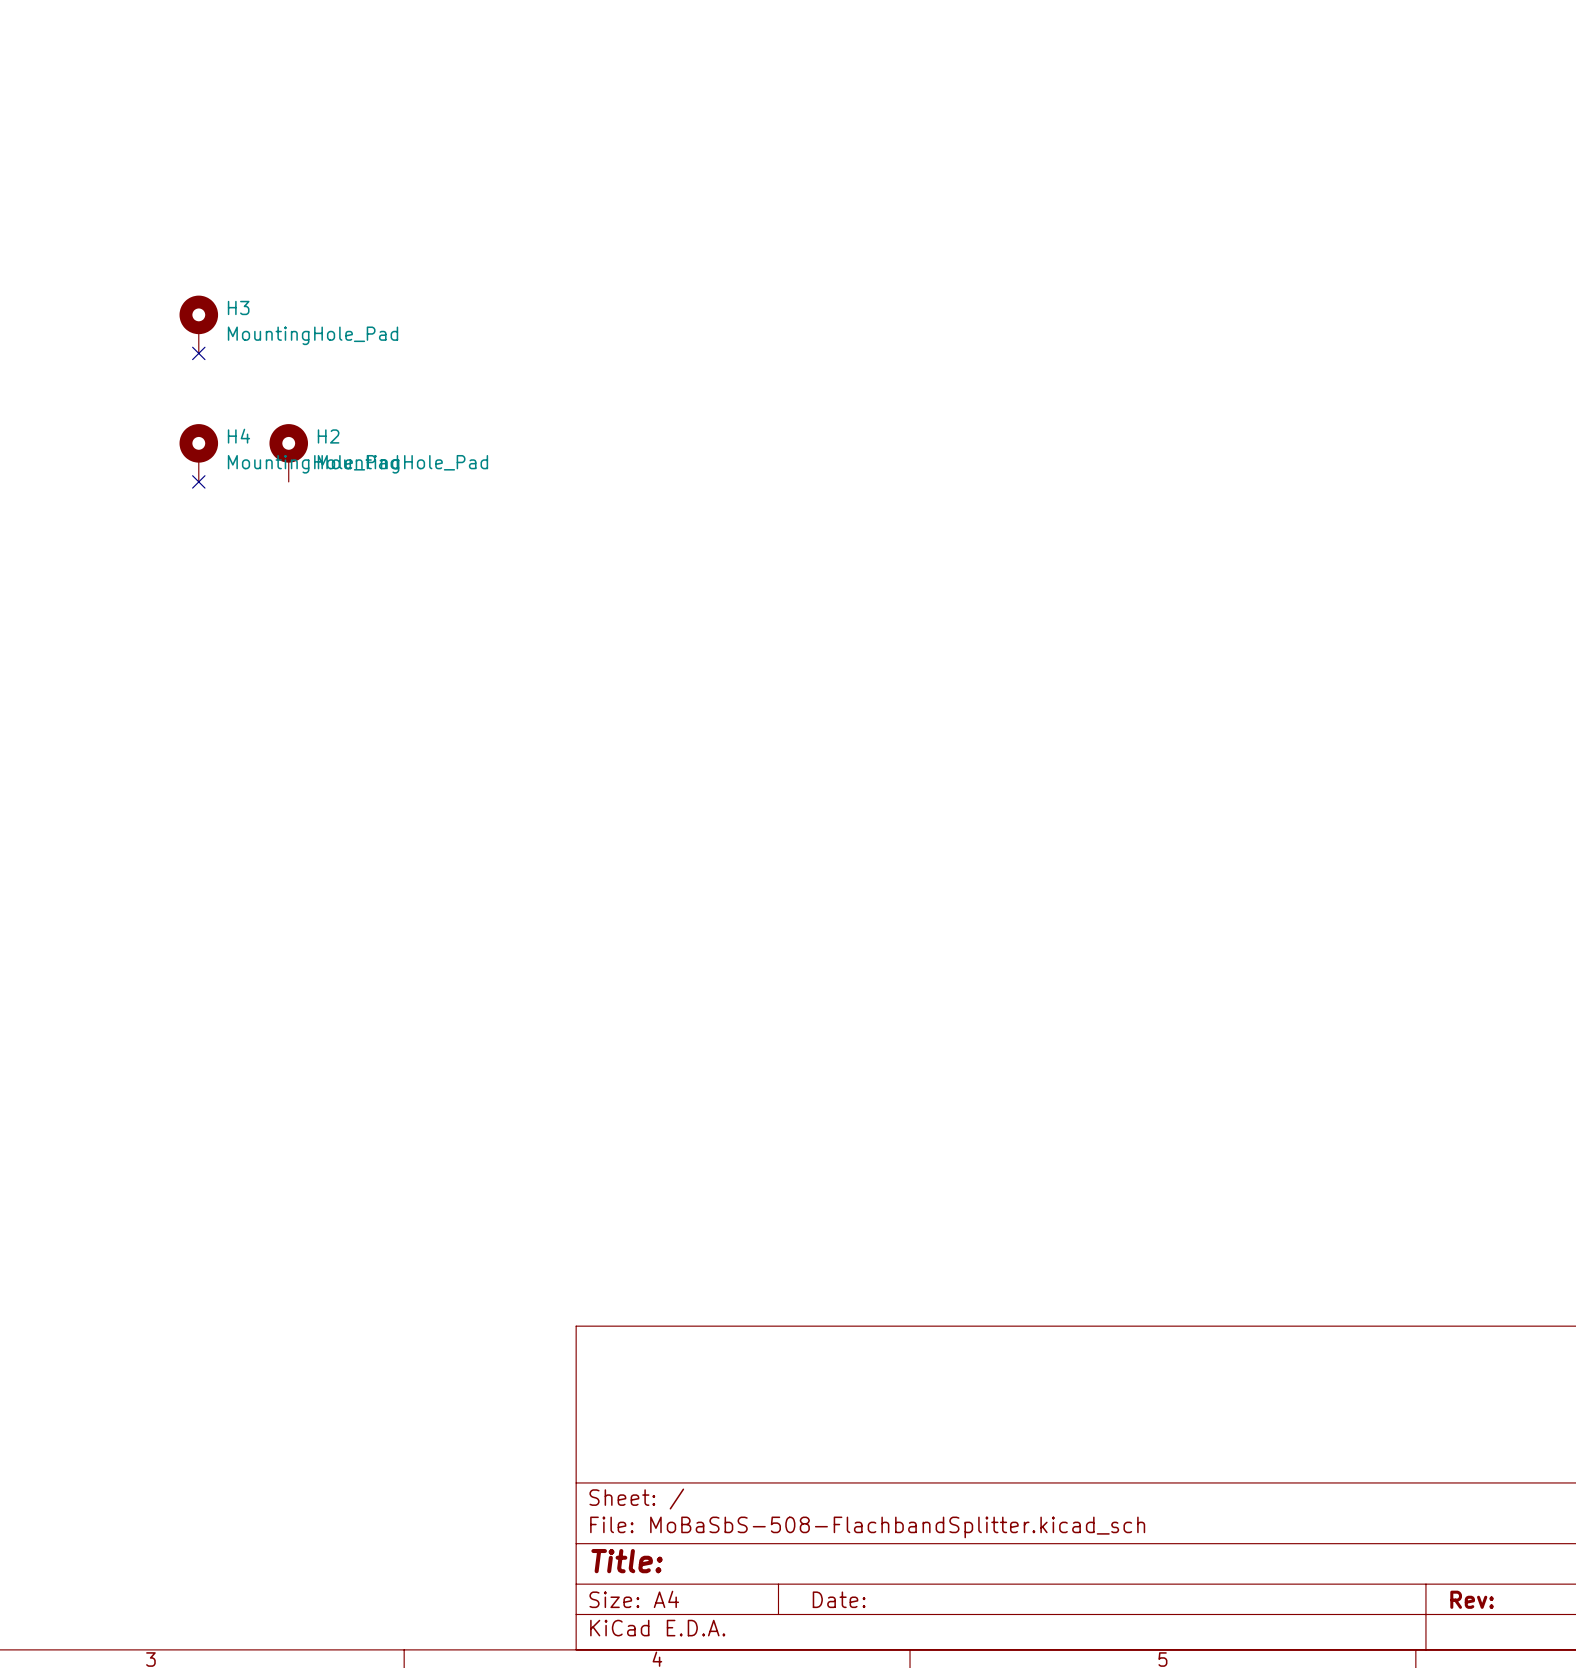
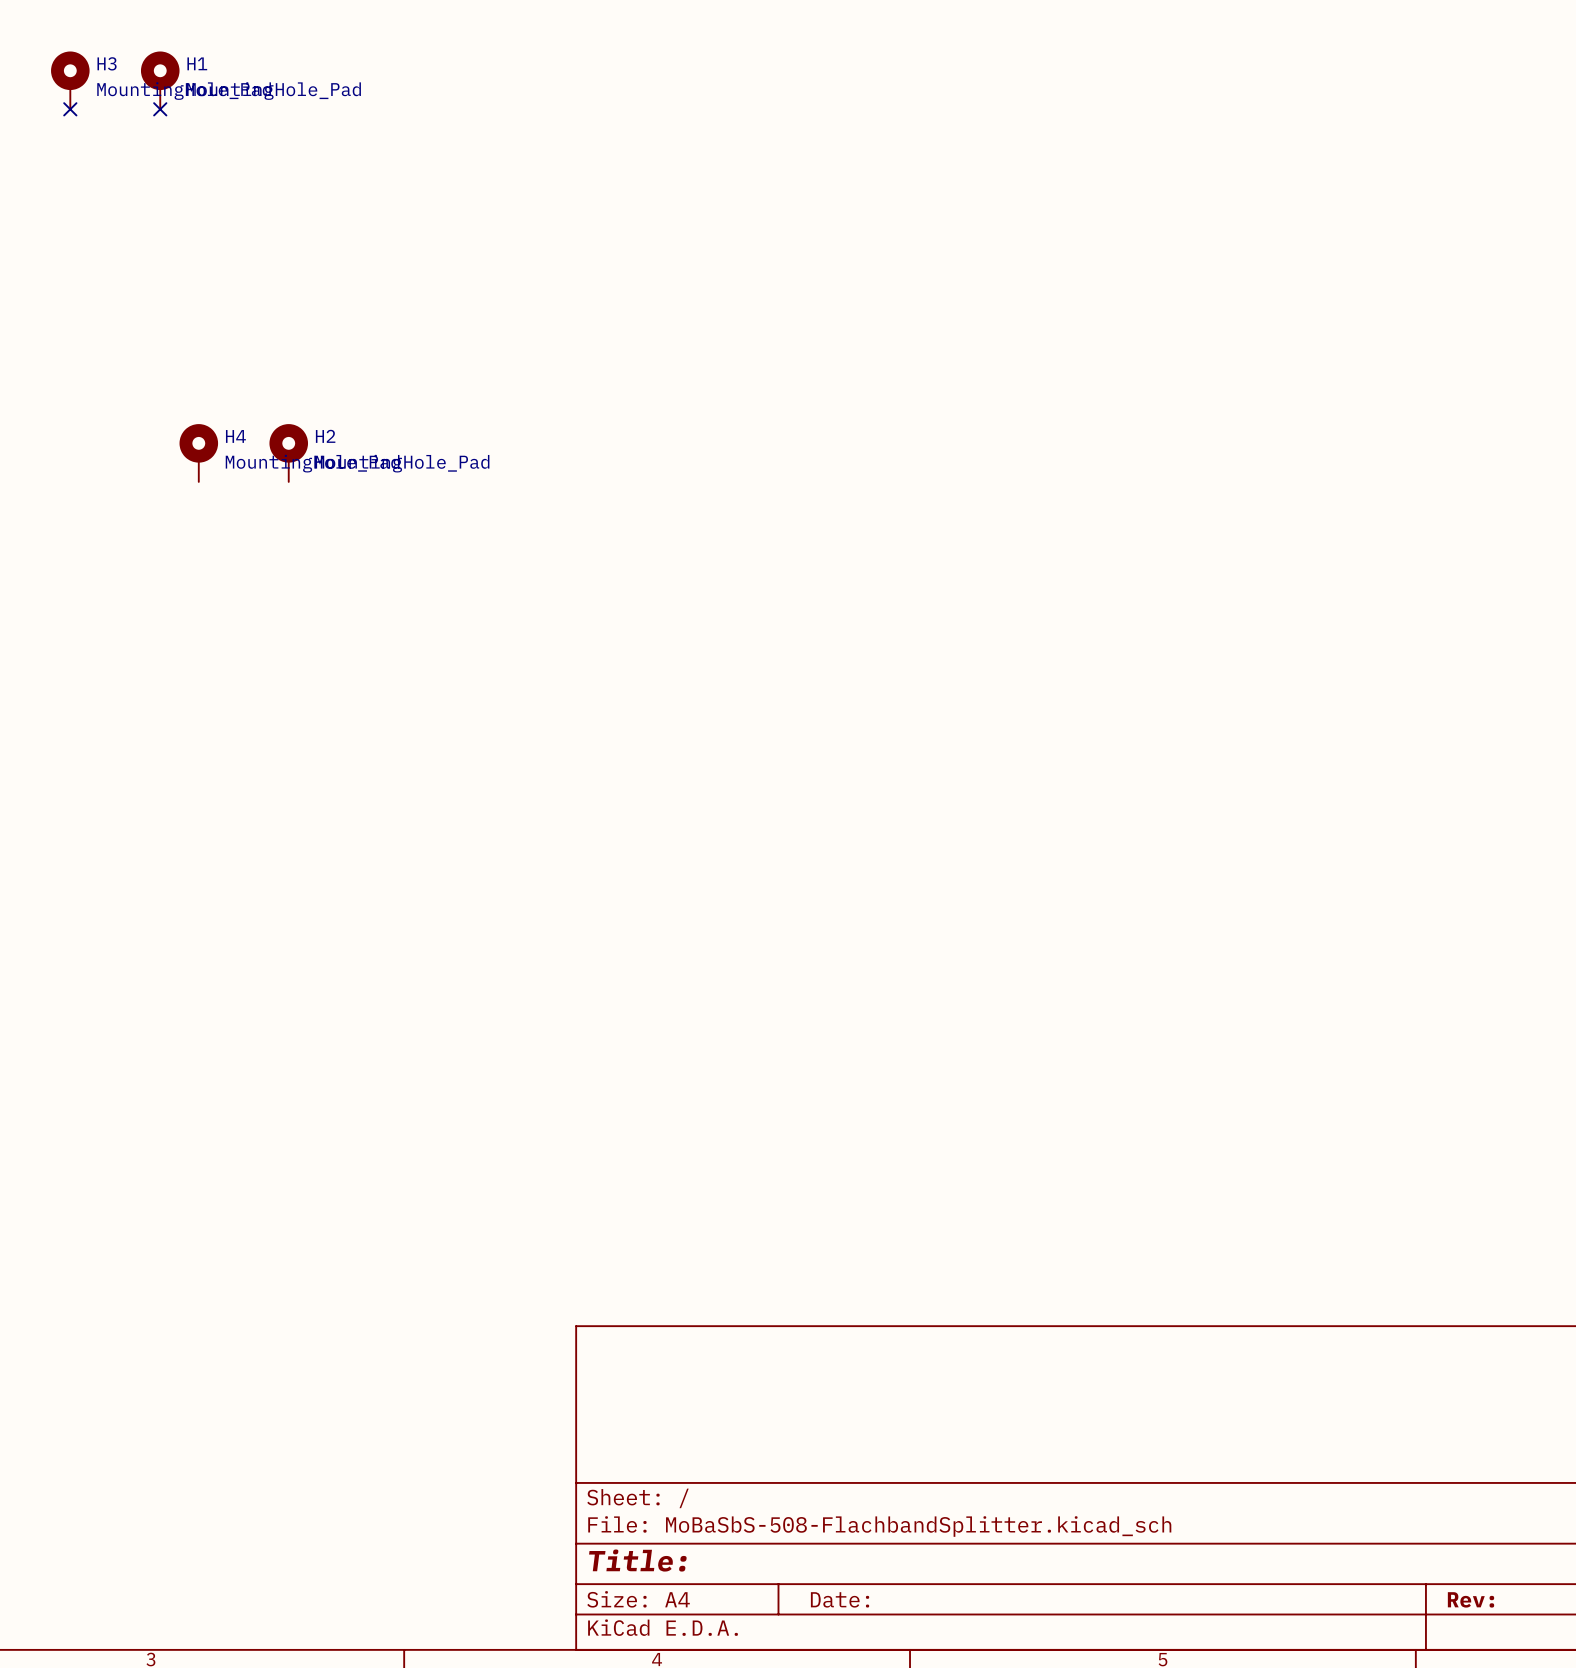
H1: none -> MountingHole_Pad (160, 80)
no-connect mark: none -> (70, 109)
no-connect mark: none -> (160, 109)
H3 position: (198, 324) -> (70, 80)
no-connect mark: (198, 353) -> none
no-connect mark: (198, 481) -> none

